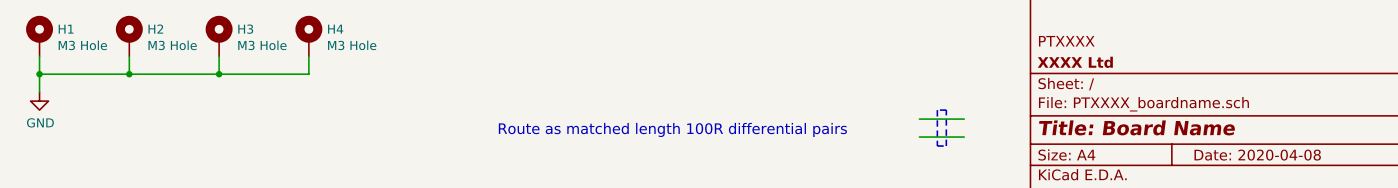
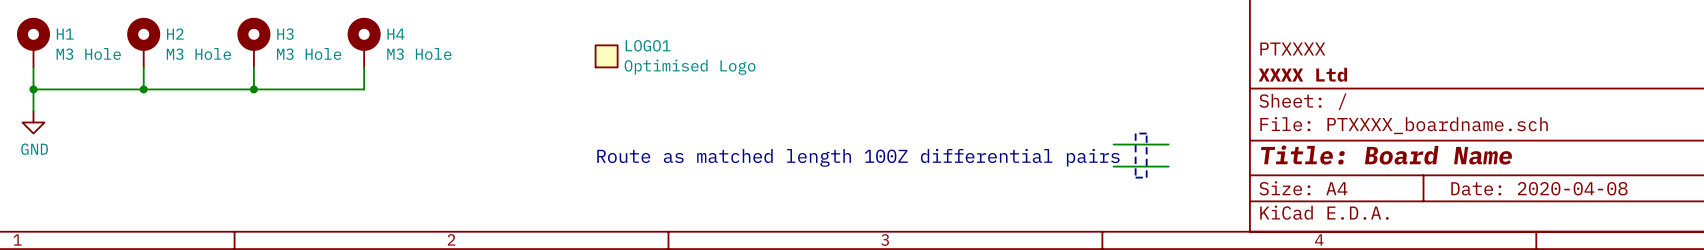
LOGO1: none -> Optimised Logo (606, 56)
text: Route as matched length 100R differential pairs (672, 129) -> Route as matched length 100Z differential pairs (858, 157)

